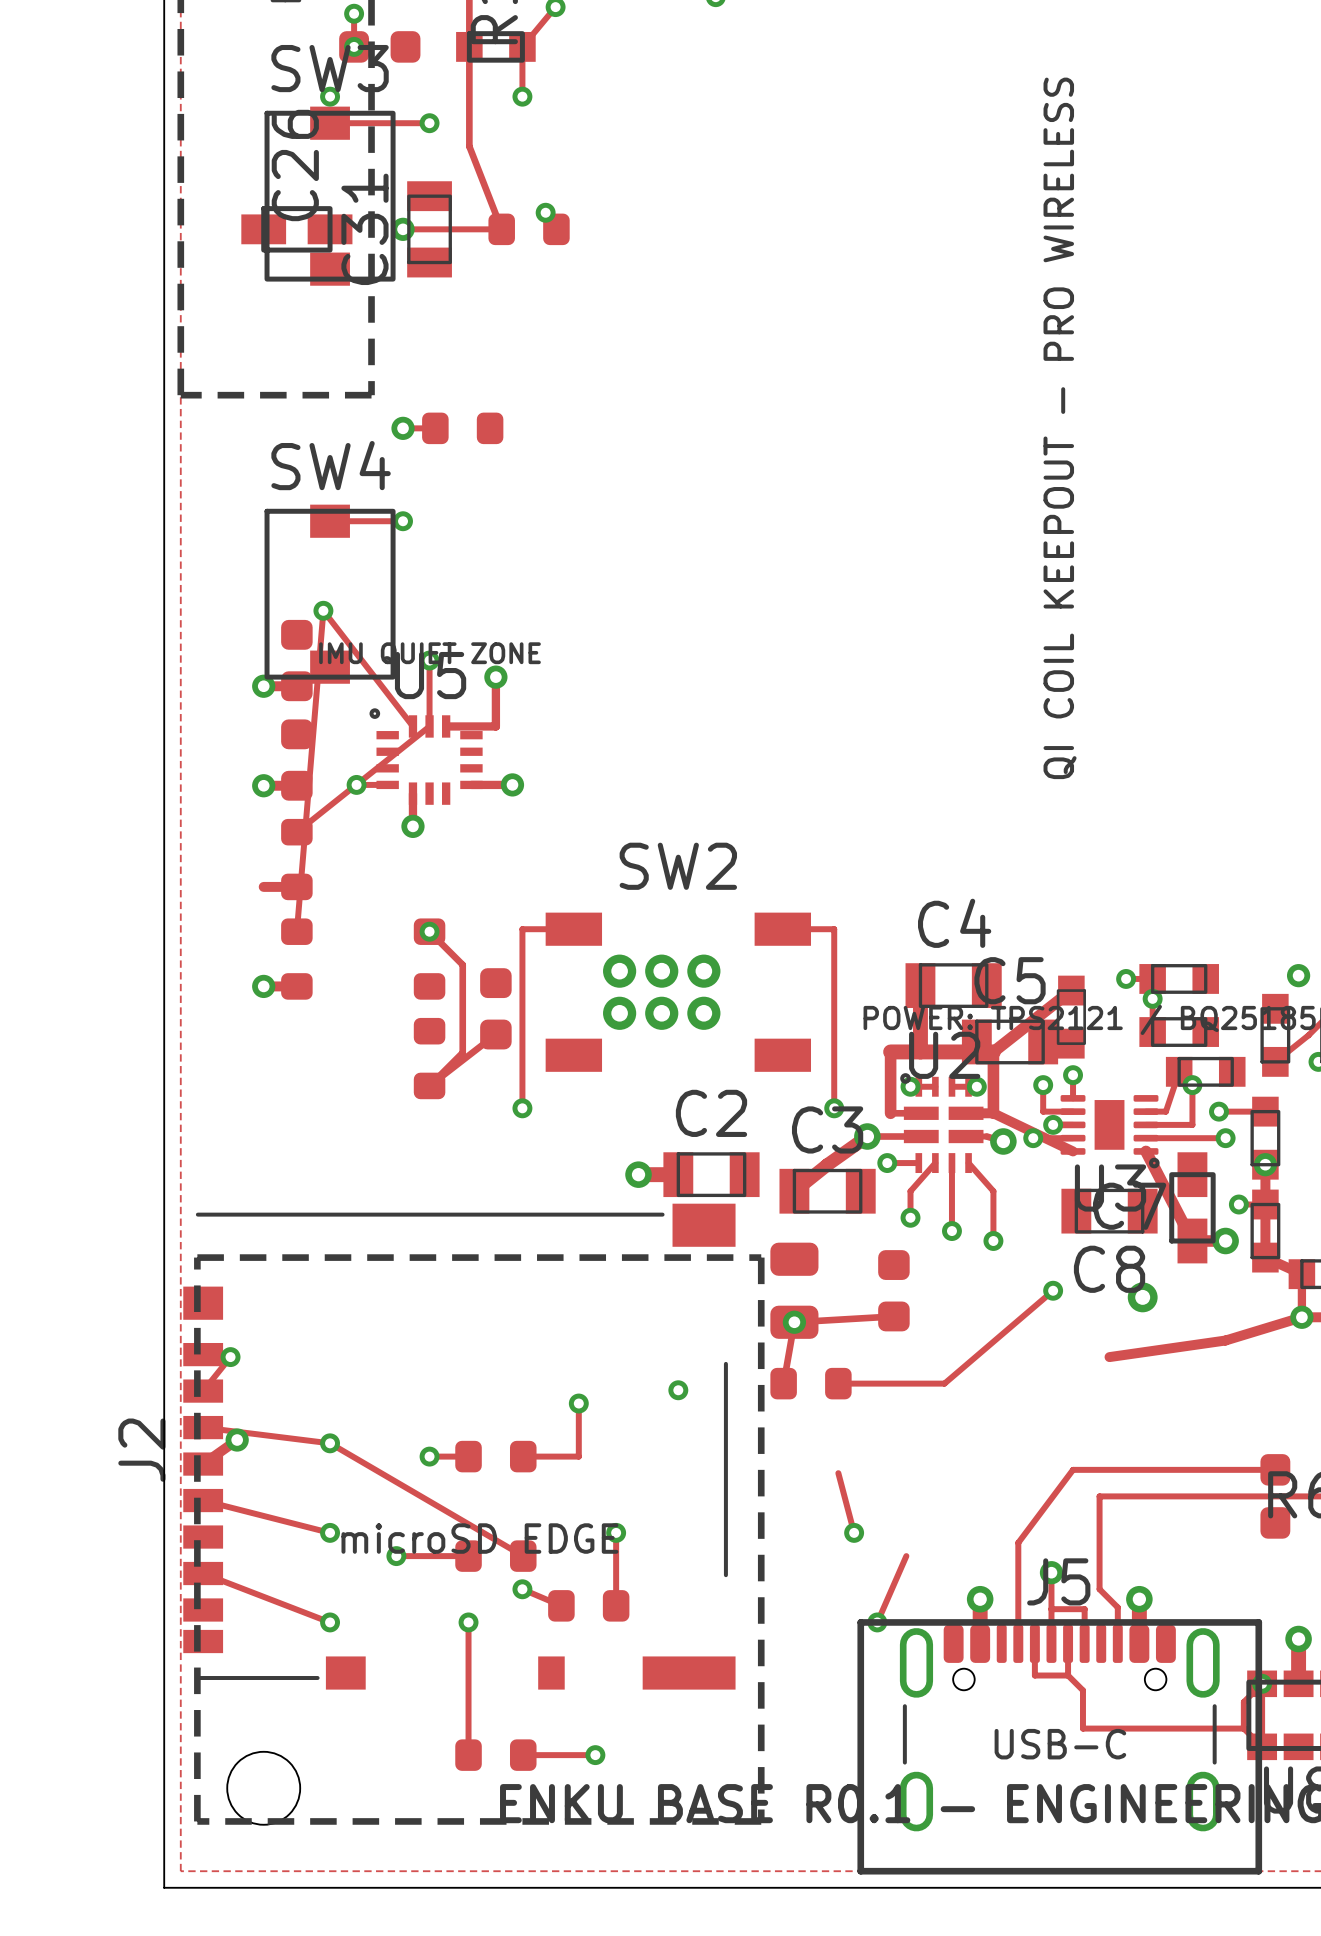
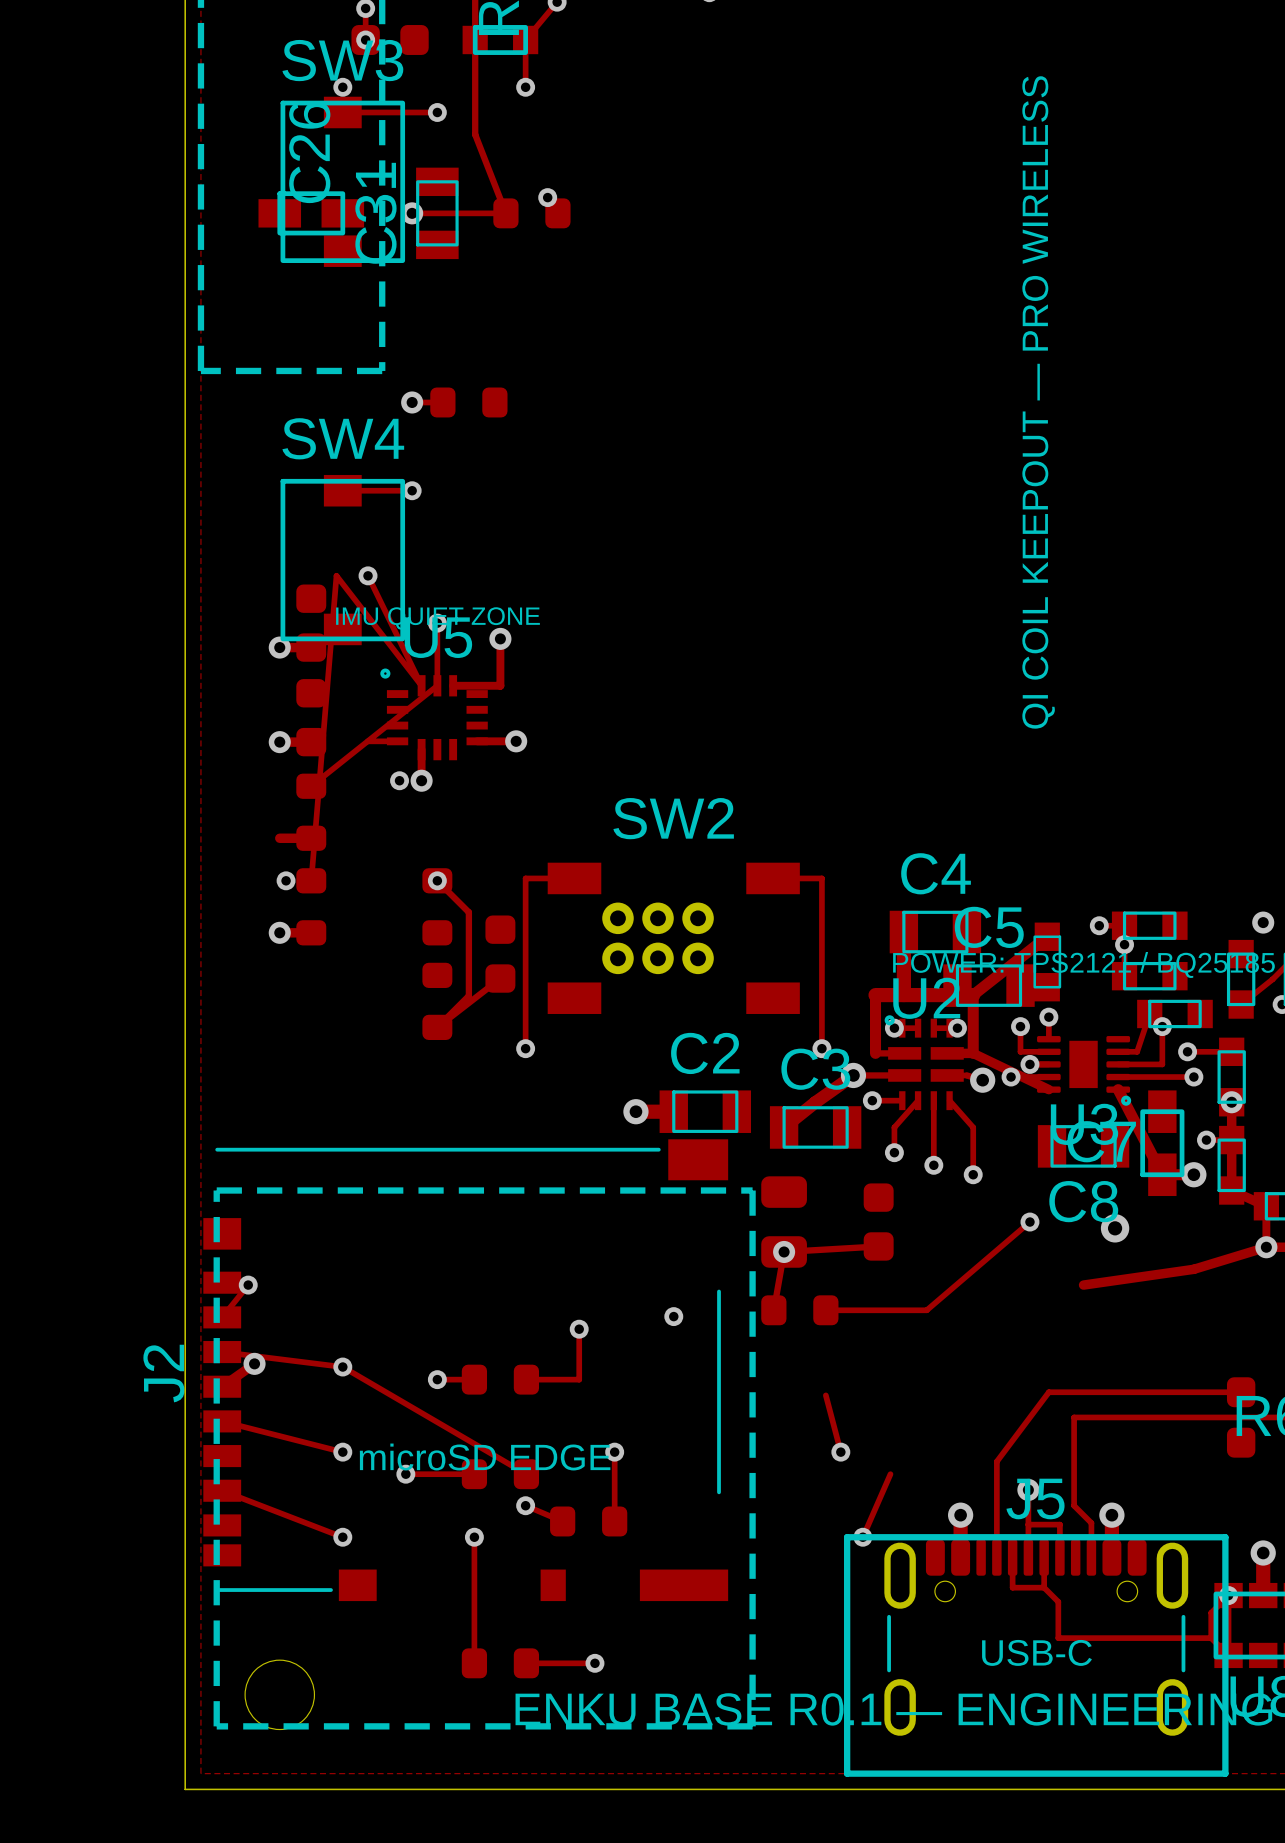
via position: (323, 610) -> (368, 575)
track: none -> (368, 575) (421, 685)
via position: (356, 784) -> (399, 780)
via: none -> (286, 880)

